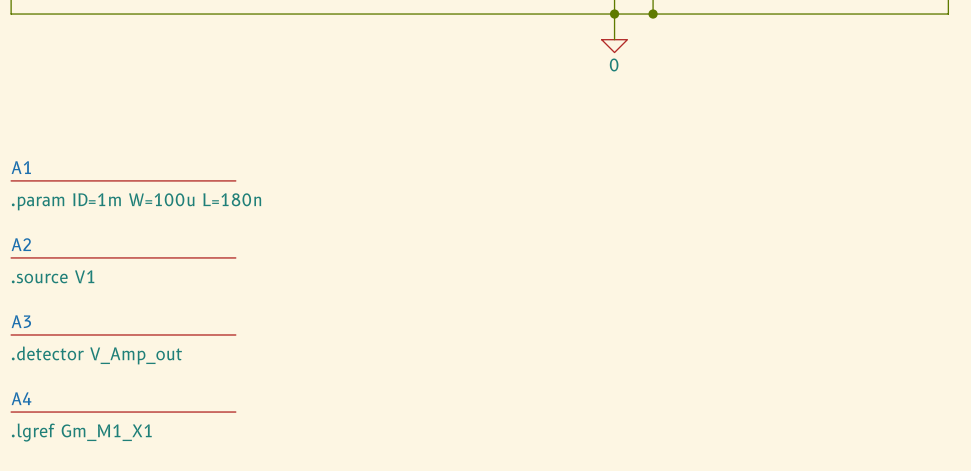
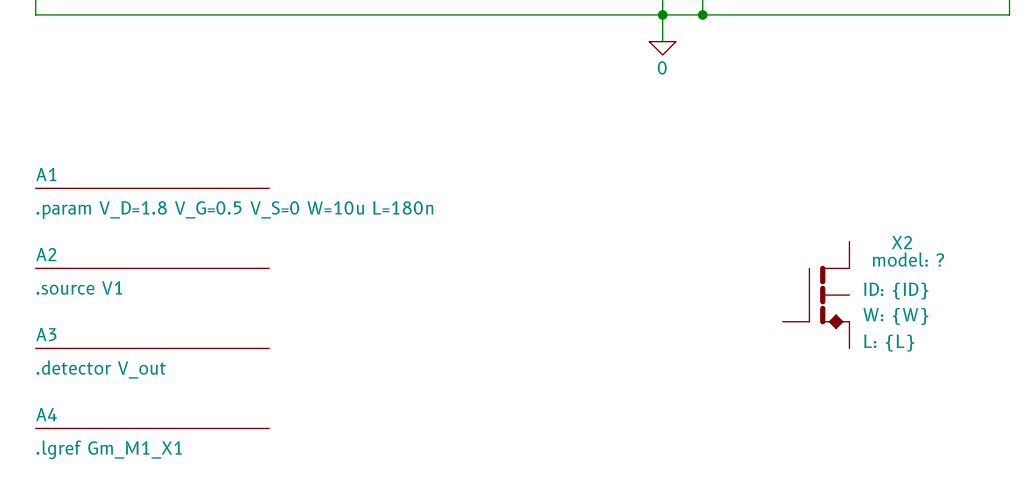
A1 text: .param ID=1m W=100u L=180n (136, 201) -> .param V_D=1.8 V_G=0.5 V_S=0 W=10u L=180n (234, 210)
X2: none -> (816, 295)
A3 text: .detector V_Amp_out (96, 355) -> .detector V_out (101, 369)

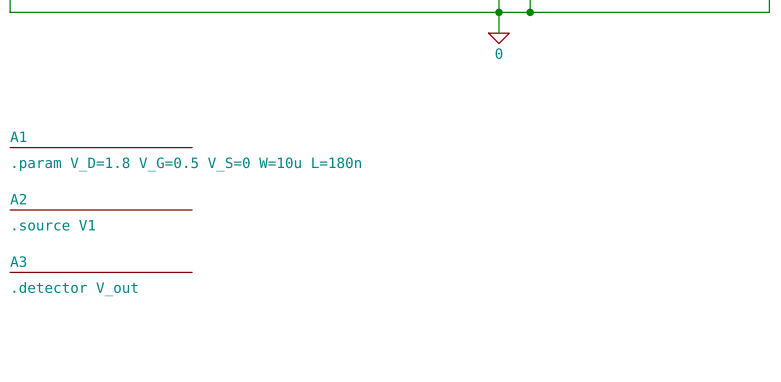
X2: (816, 295) -> none
A4: (152, 428) -> none

